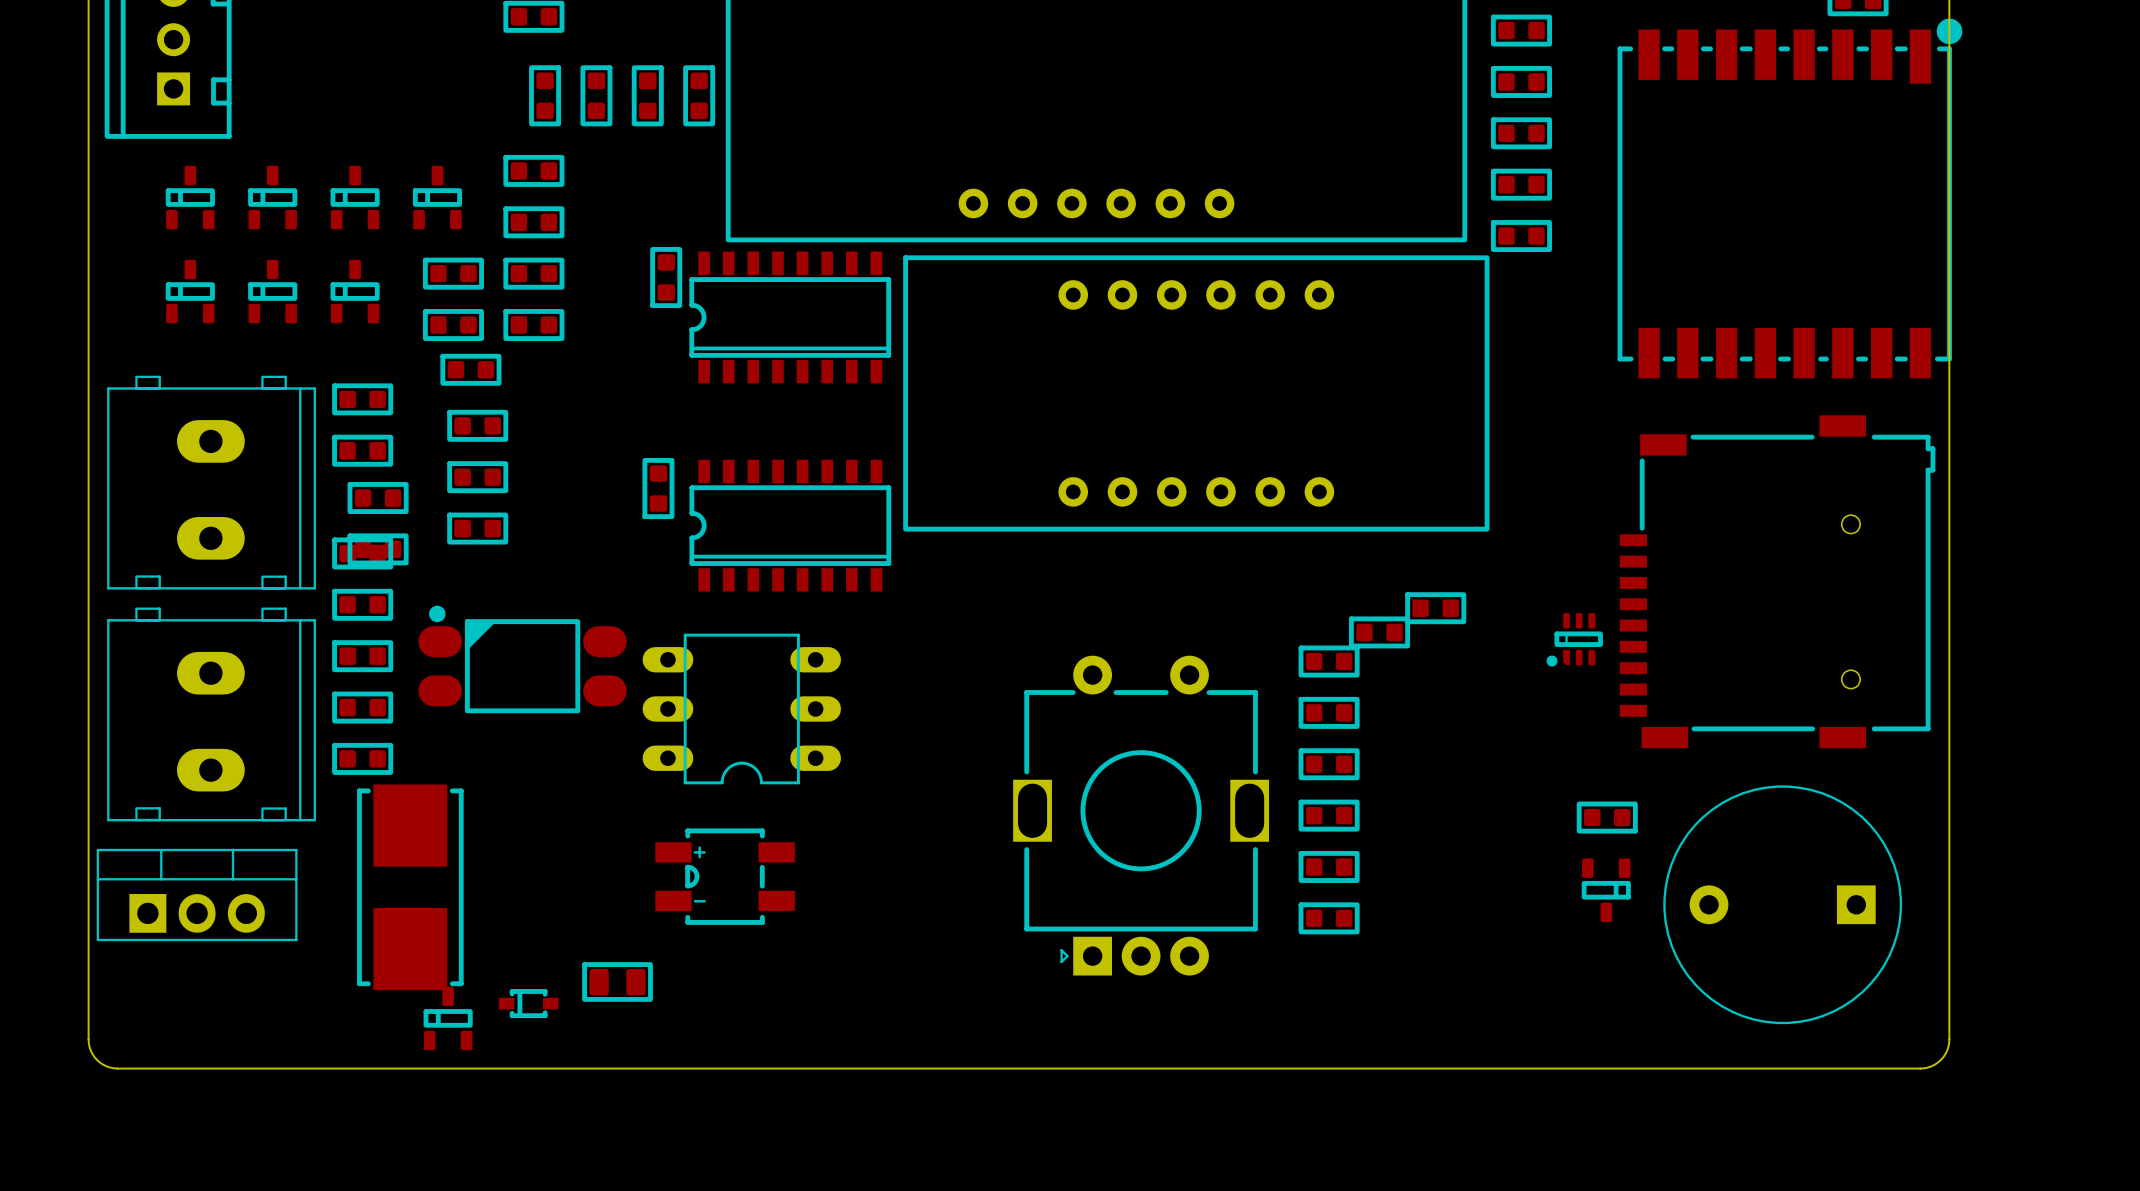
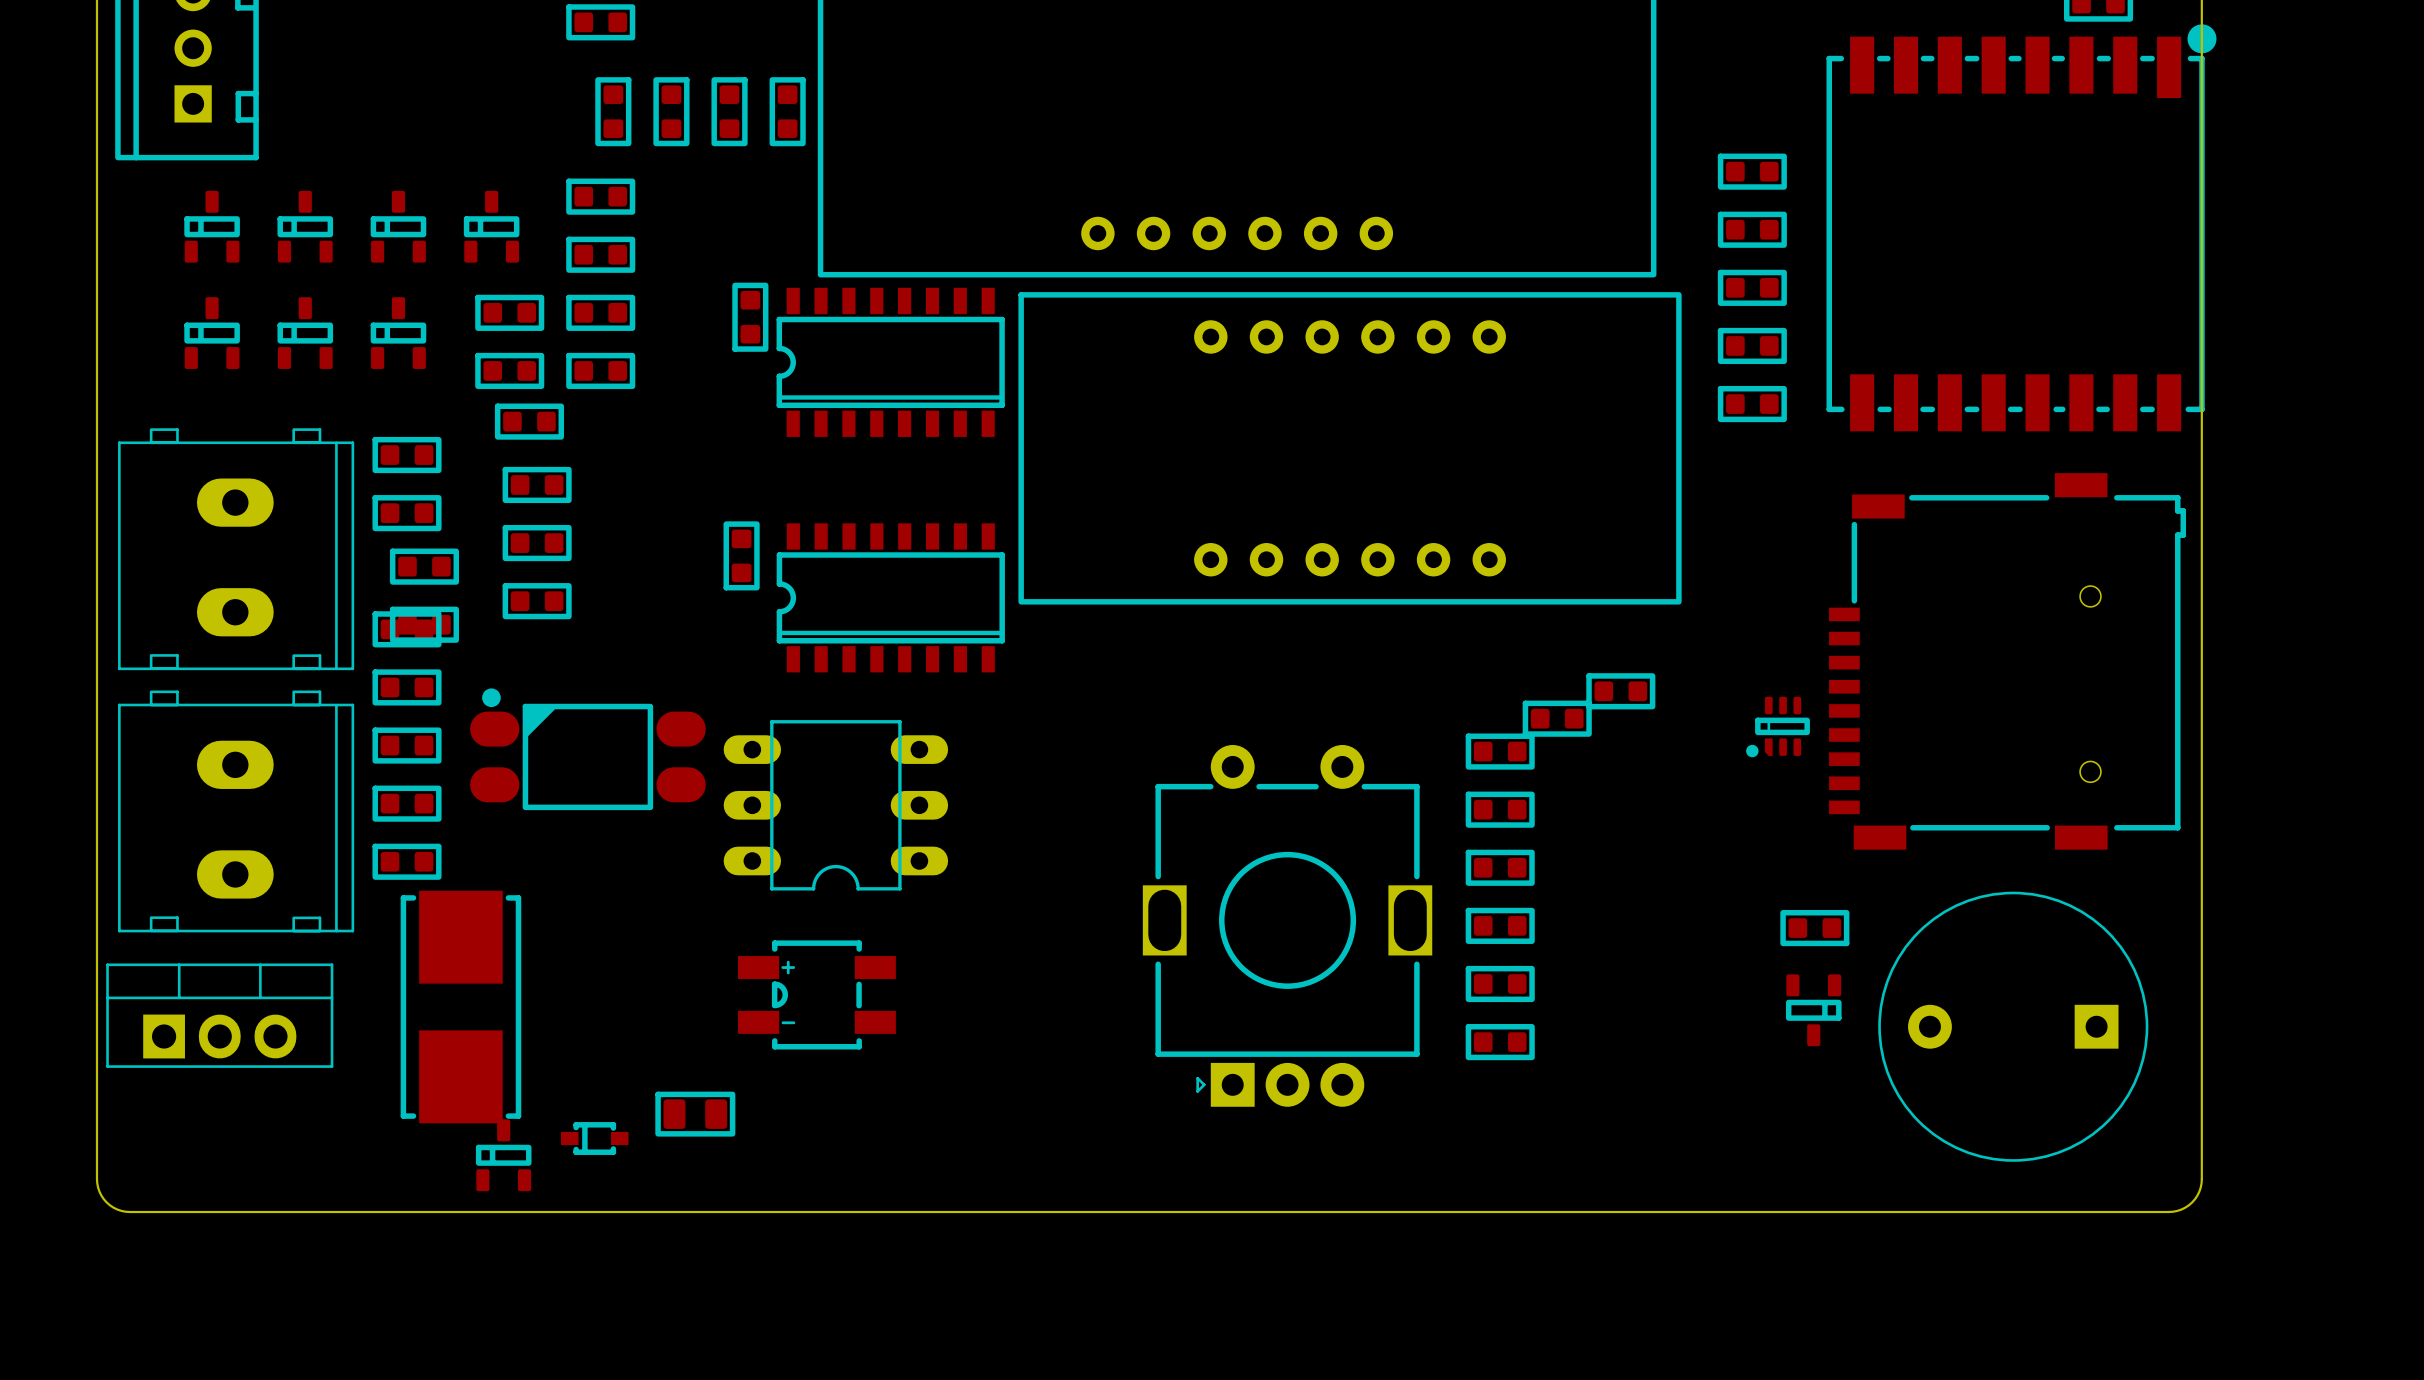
part: (1521, 30) -> none
part: (1521, 81) -> none
part: (1521, 133) -> none
part: none -> (1752, 171)
part: (1521, 184) -> none
part: none -> (1752, 229)
part: (1521, 236) -> none
part: none -> (1752, 287)
part: none -> (1752, 345)
part: none -> (1752, 404)

